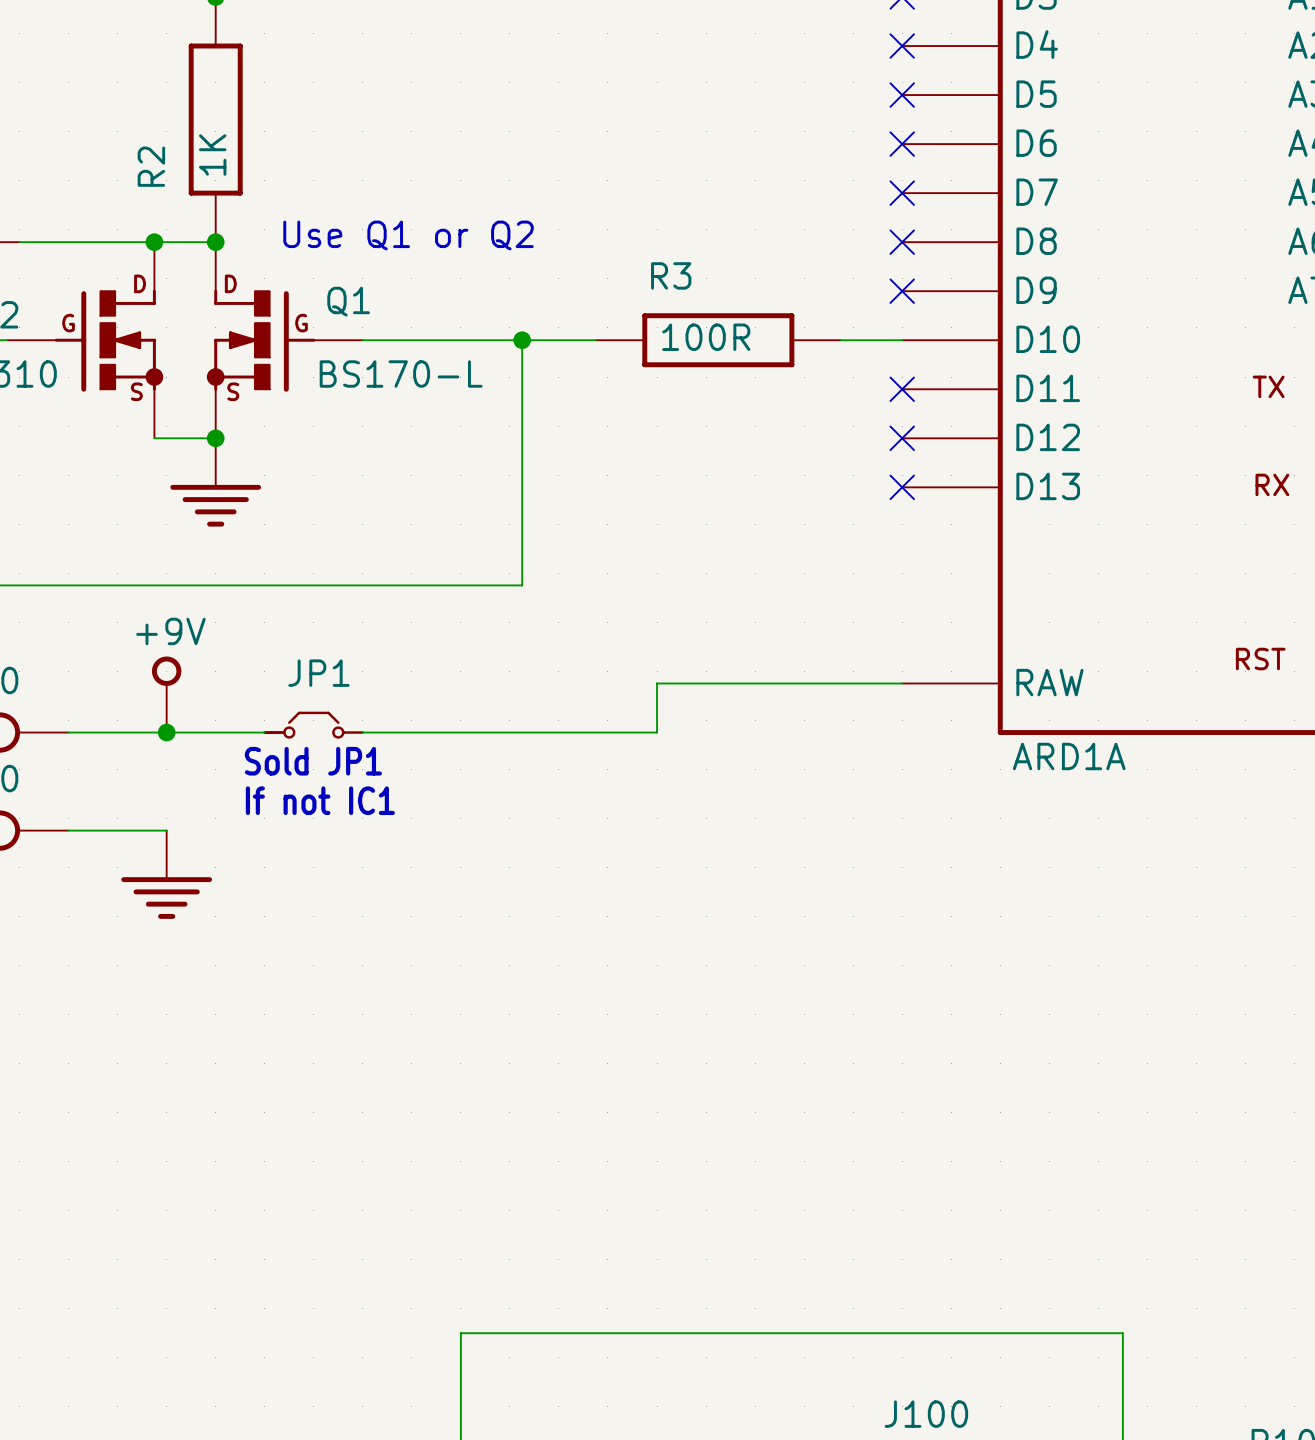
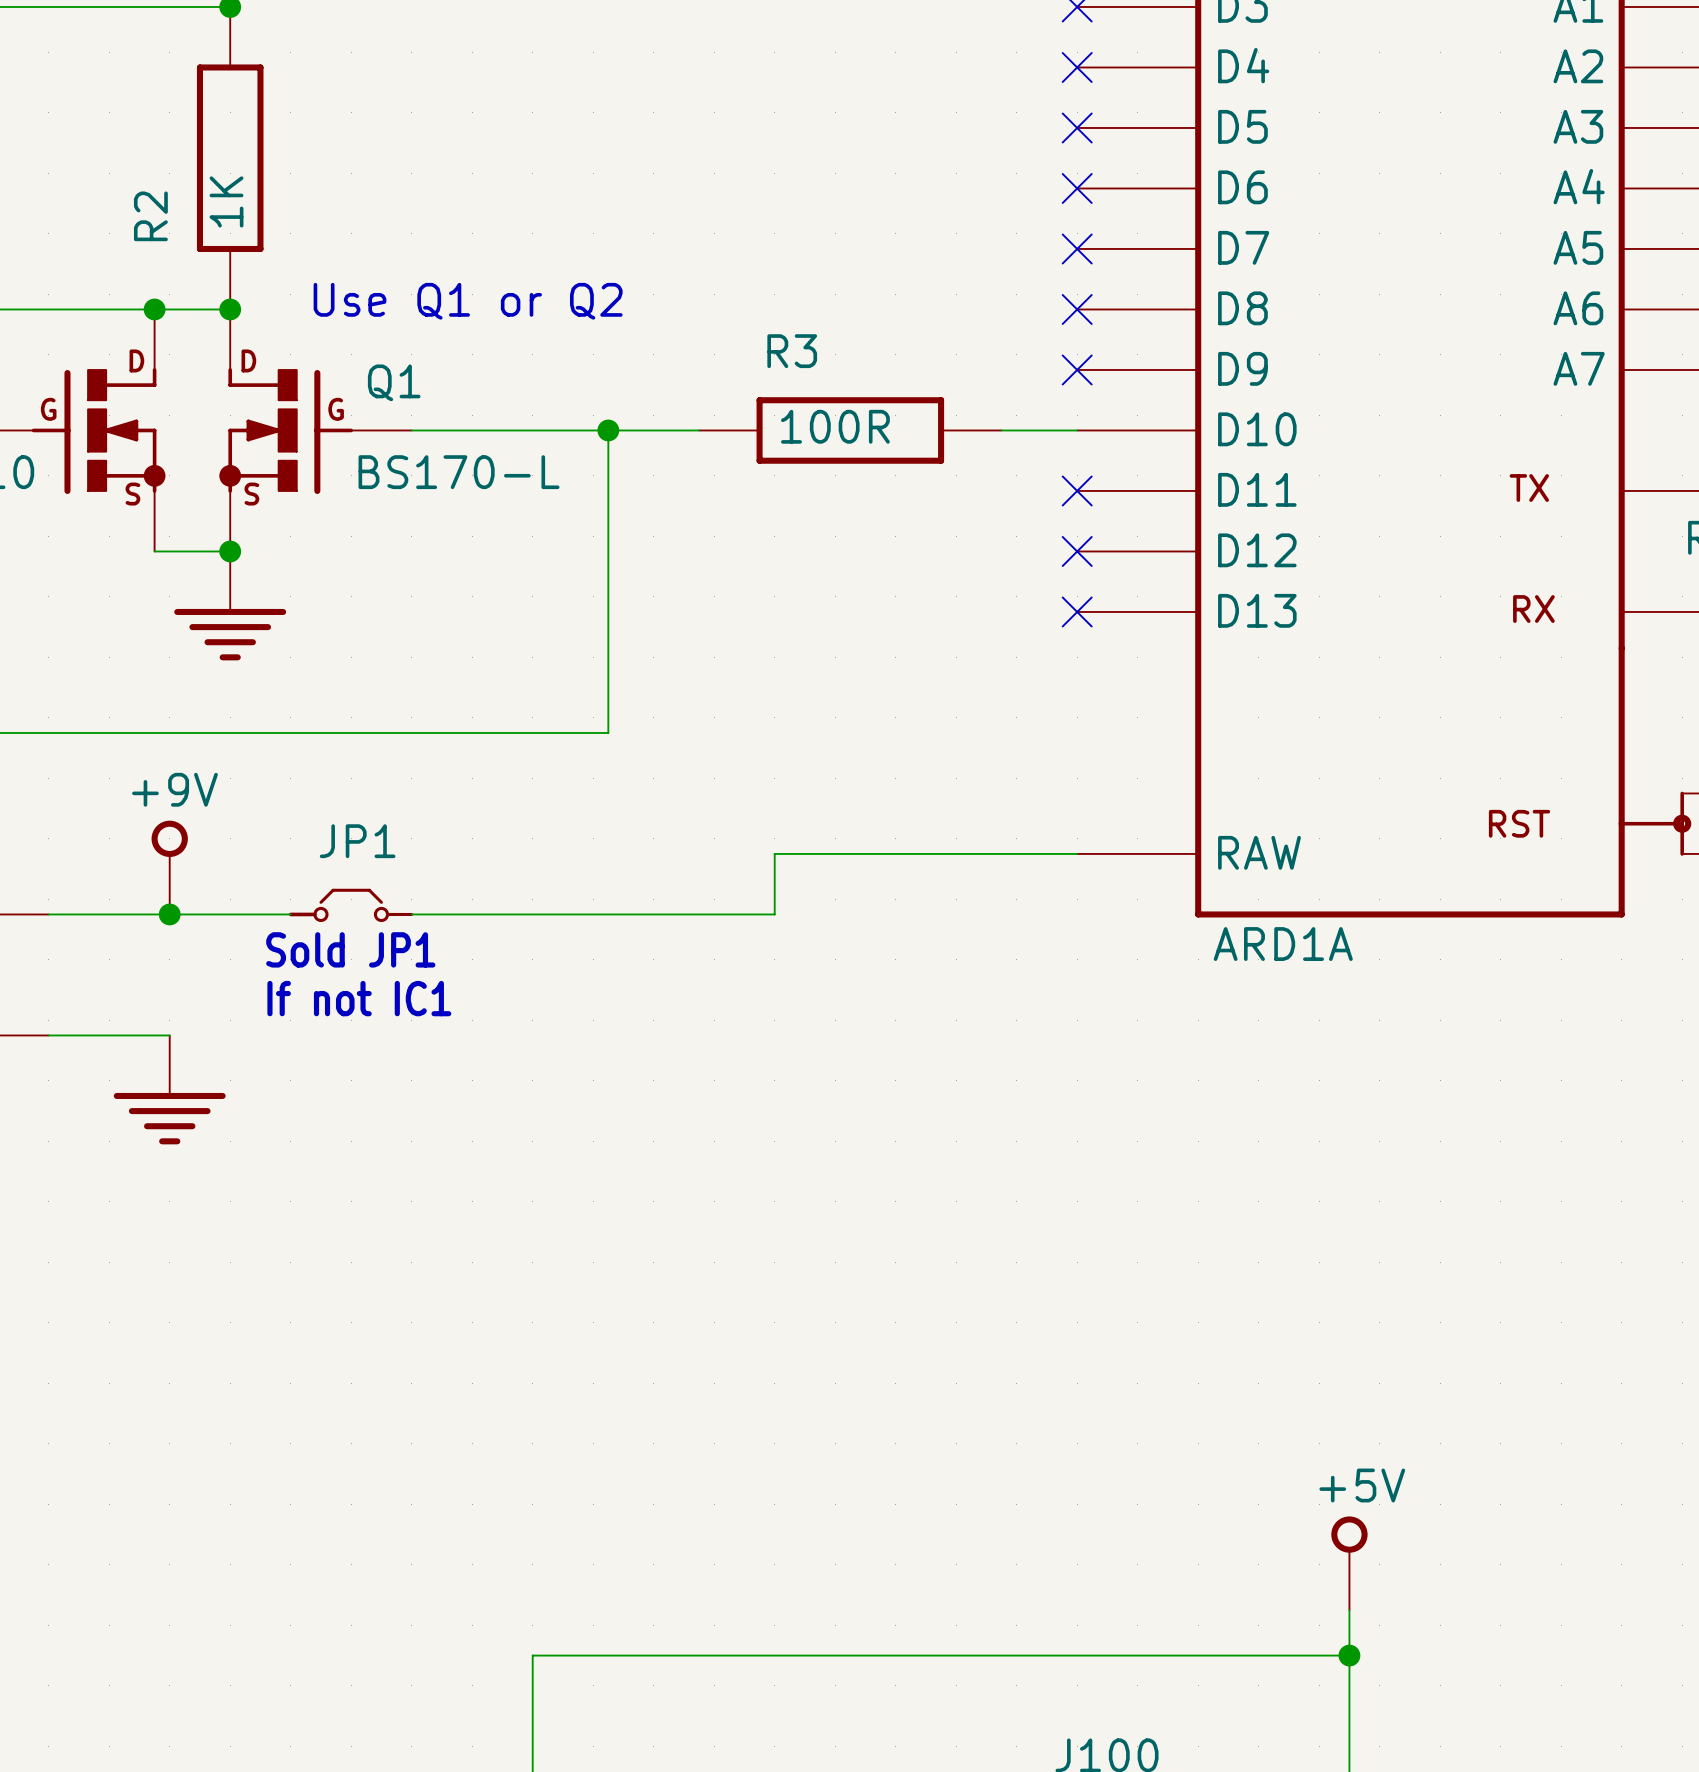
power symbol: none -> +5V (1349, 1563)
wire: none -> (1349, 1610) (1349, 1655)
junction: none -> (1349, 1655)

